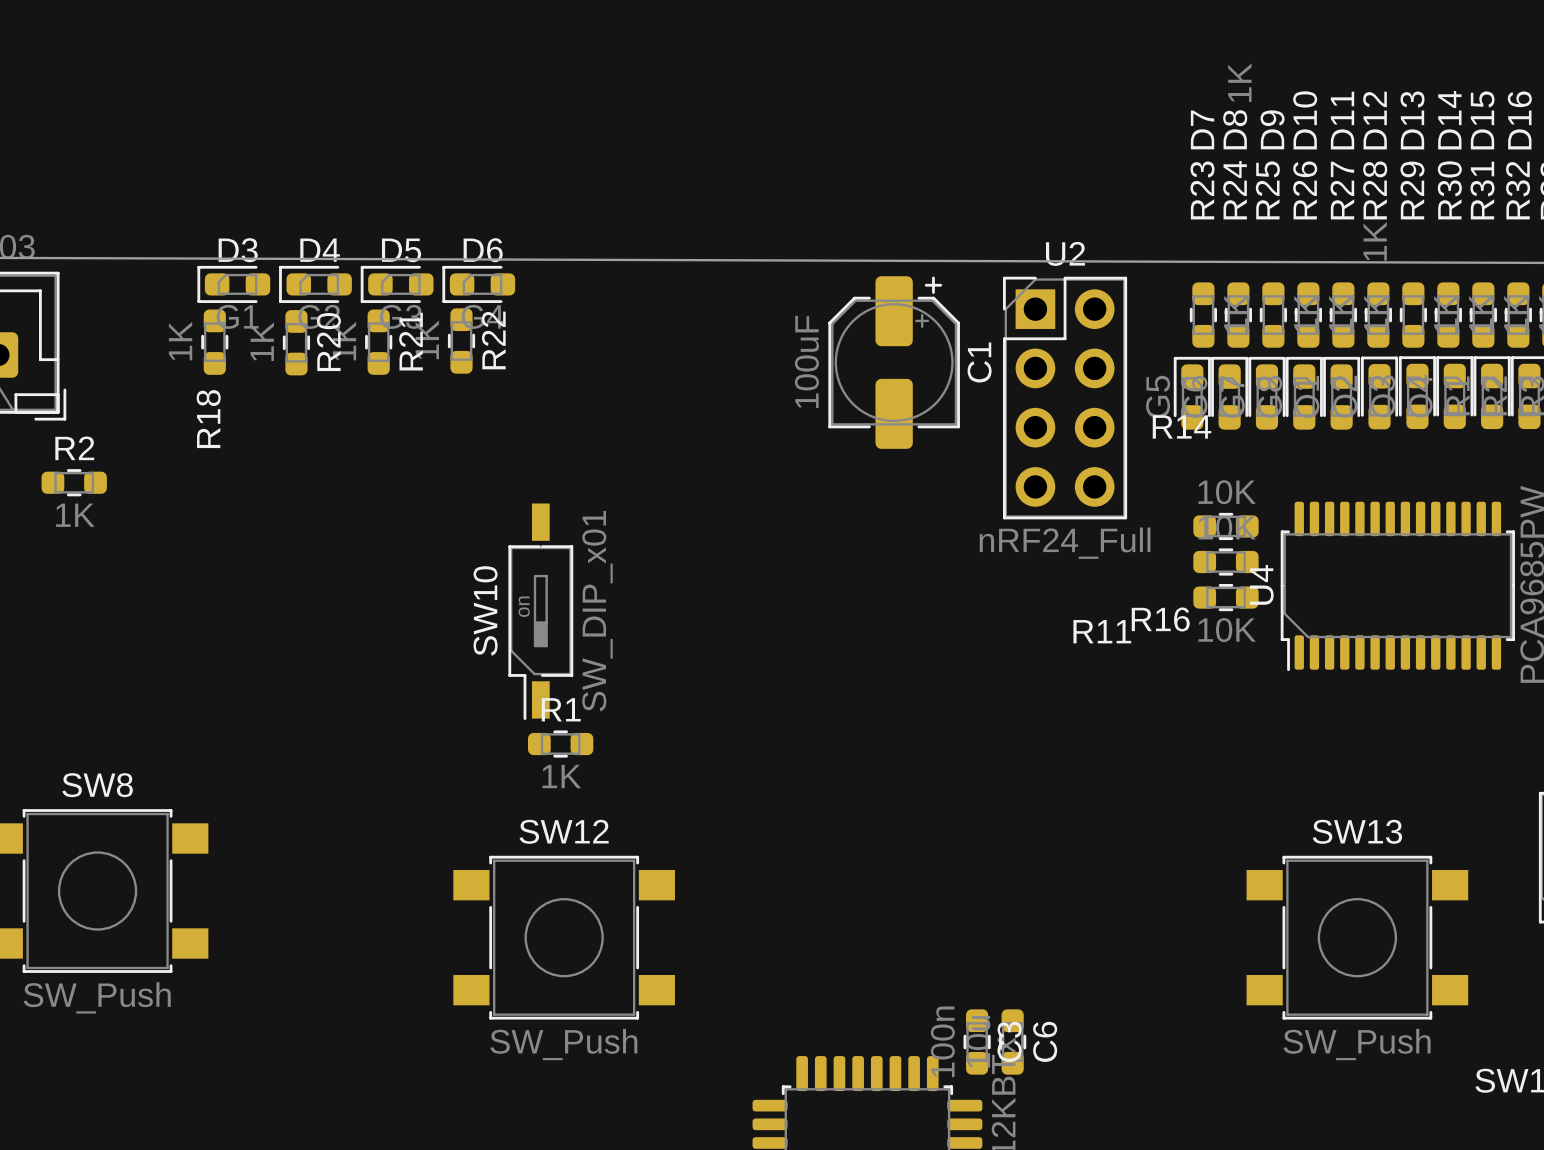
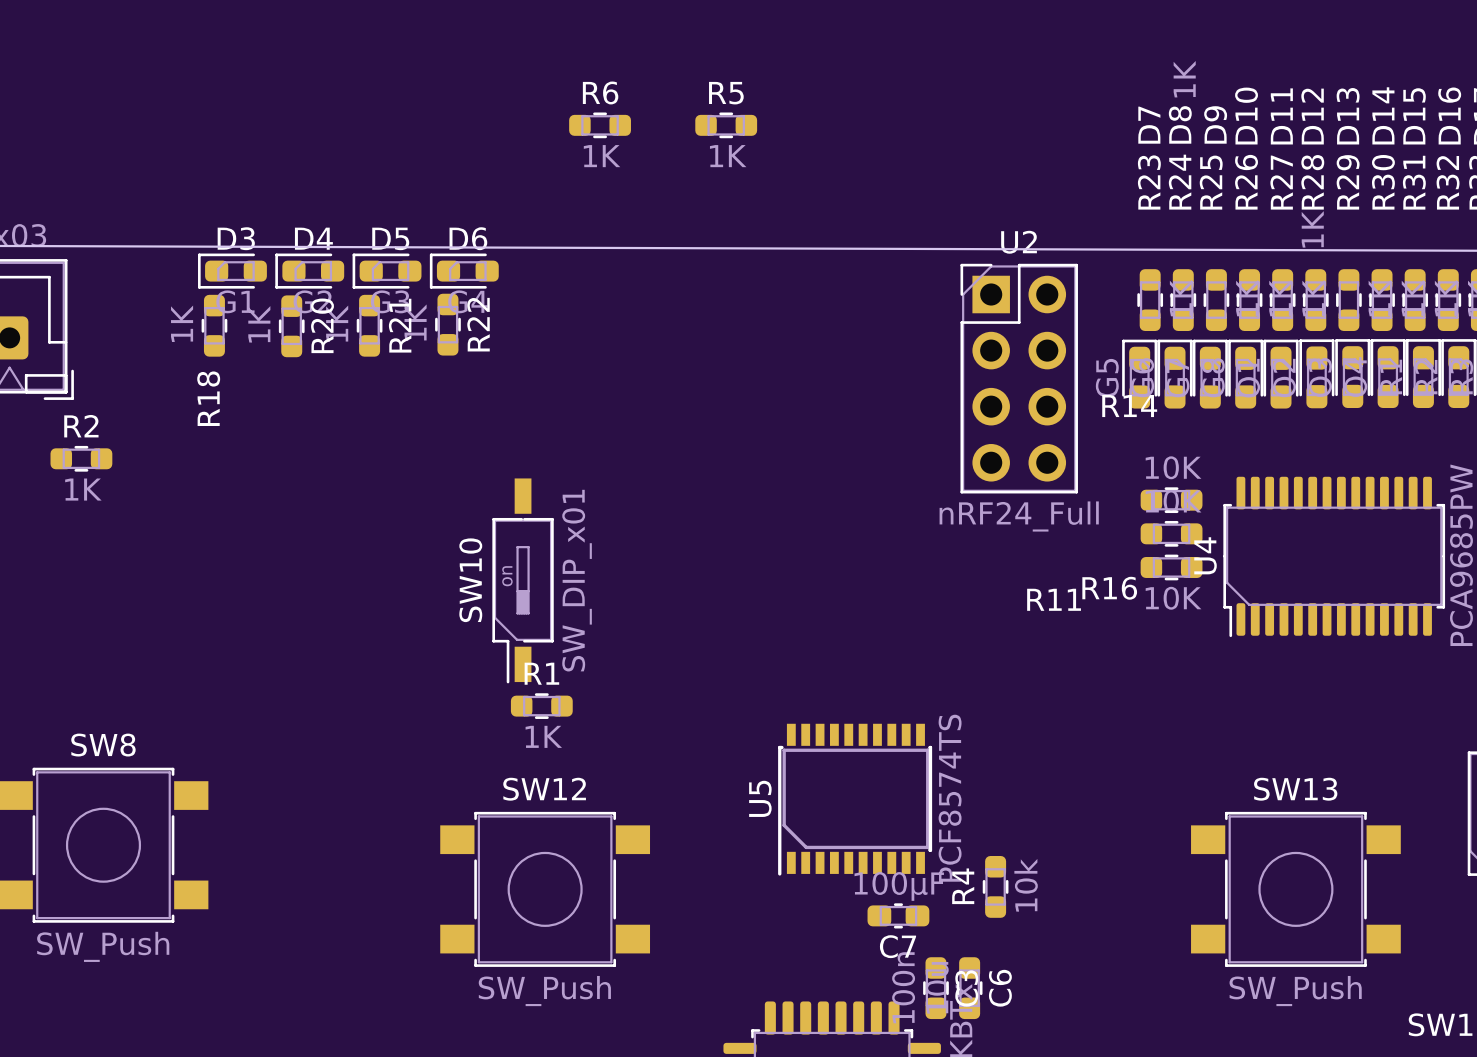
R6: none -> 1K (600, 125)
R5: none -> 1K (726, 125)
C1: 100uF (894, 362) -> none
U5: none -> PCF8574TS (855, 799)
R4: none -> 10k (995, 886)
C7: none -> 100µF (898, 915)

